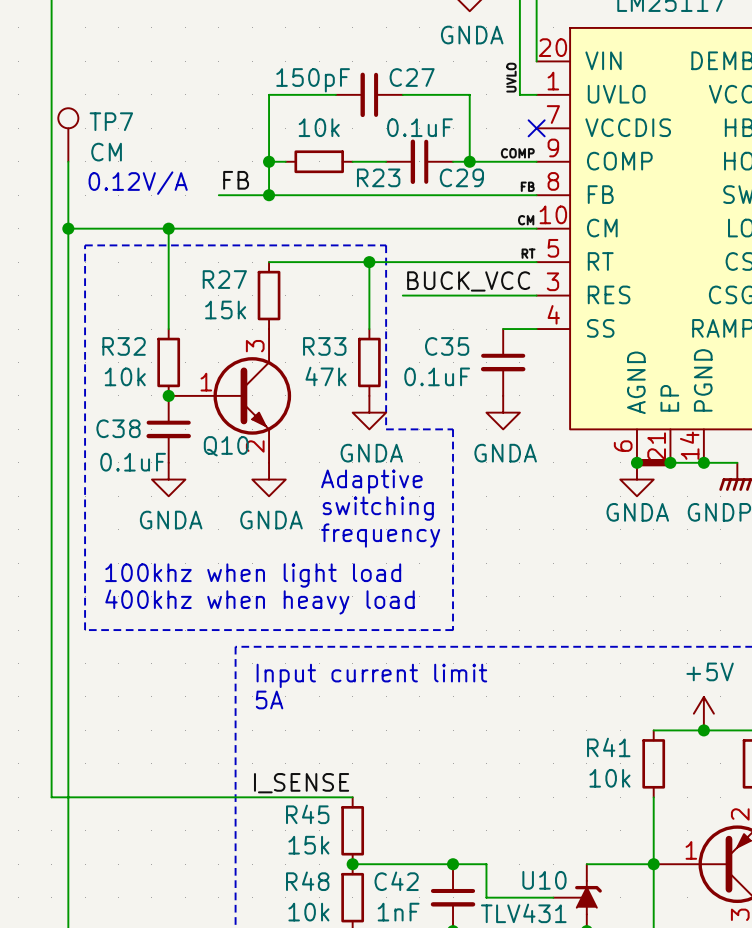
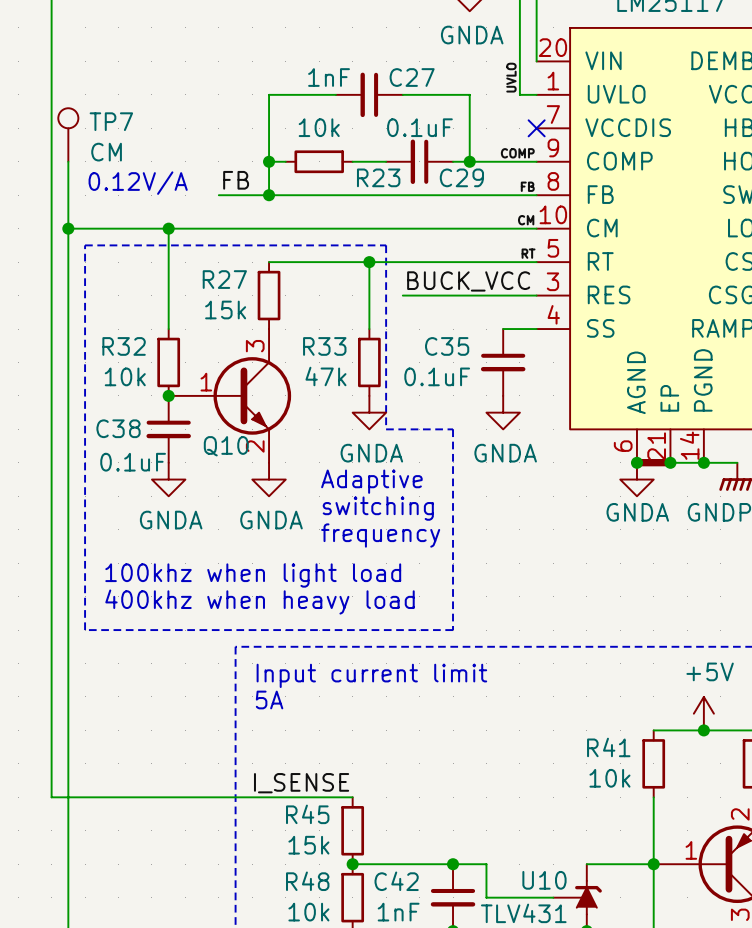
C27 value: 150pF (313, 80) -> 1nF (329, 77)

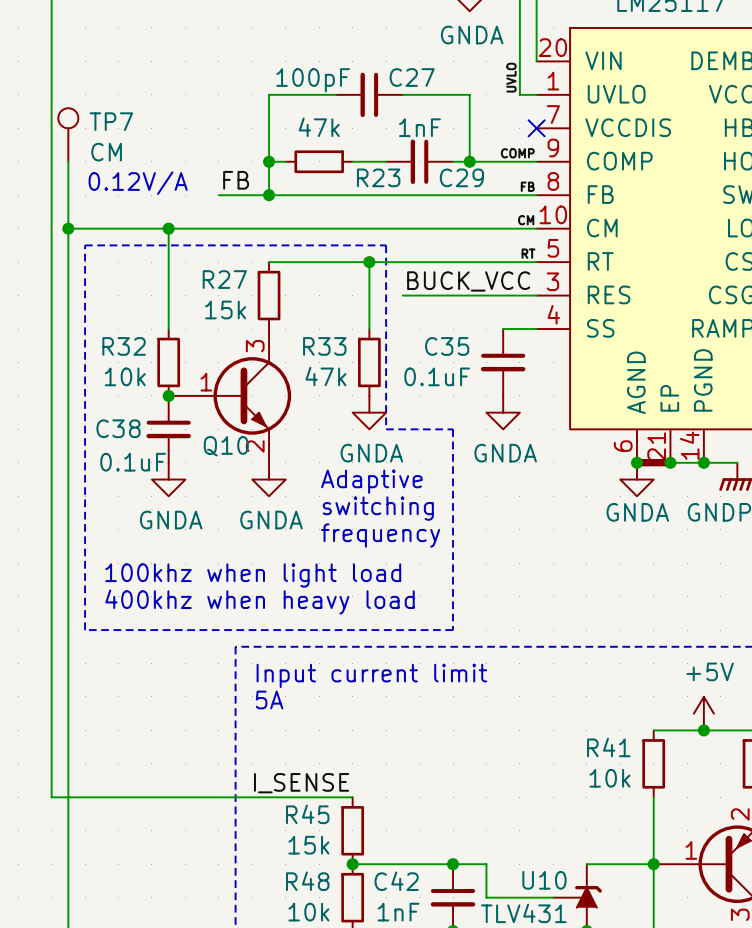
C27 value: 1nF (329, 77) -> 100pF (313, 80)
R23 value: 10k (319, 127) -> 47k (319, 127)
C29 value: 0.1uF (419, 127) -> 1nF (419, 127)

